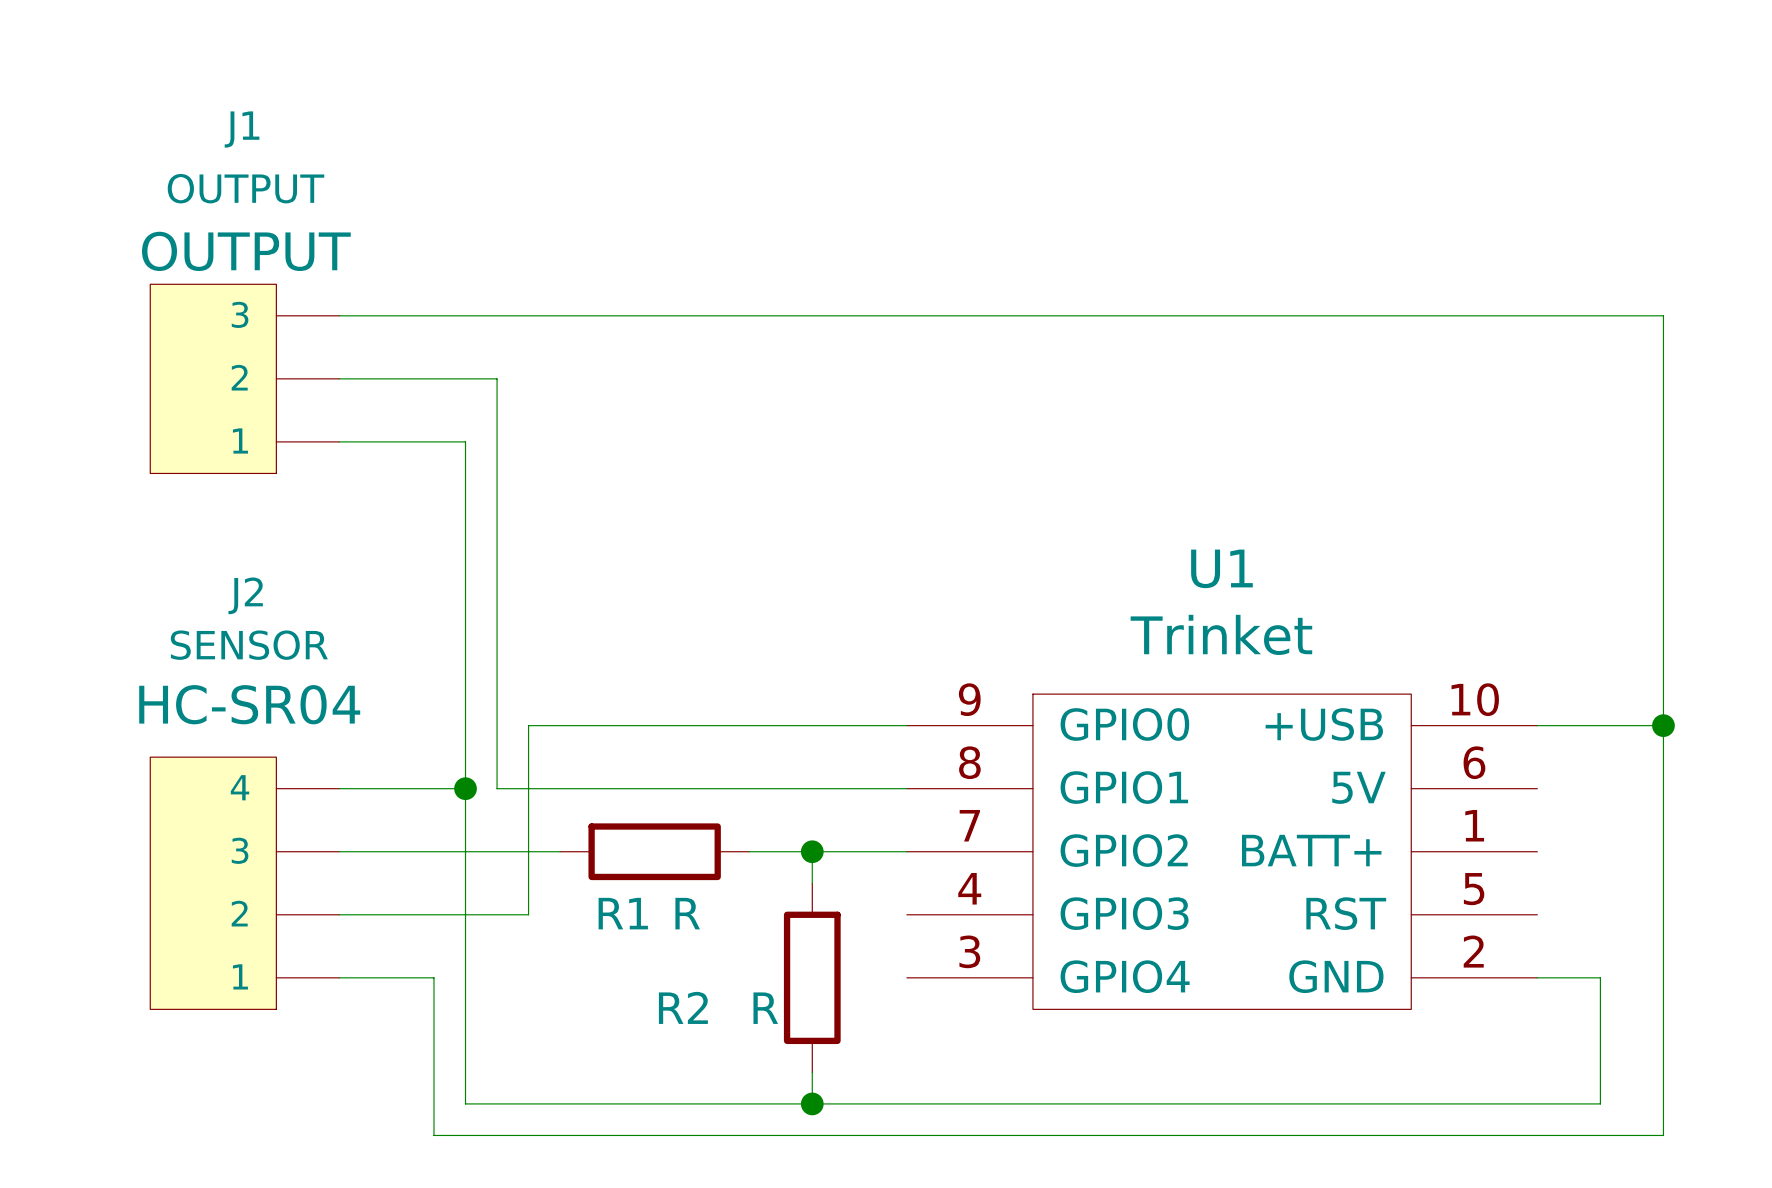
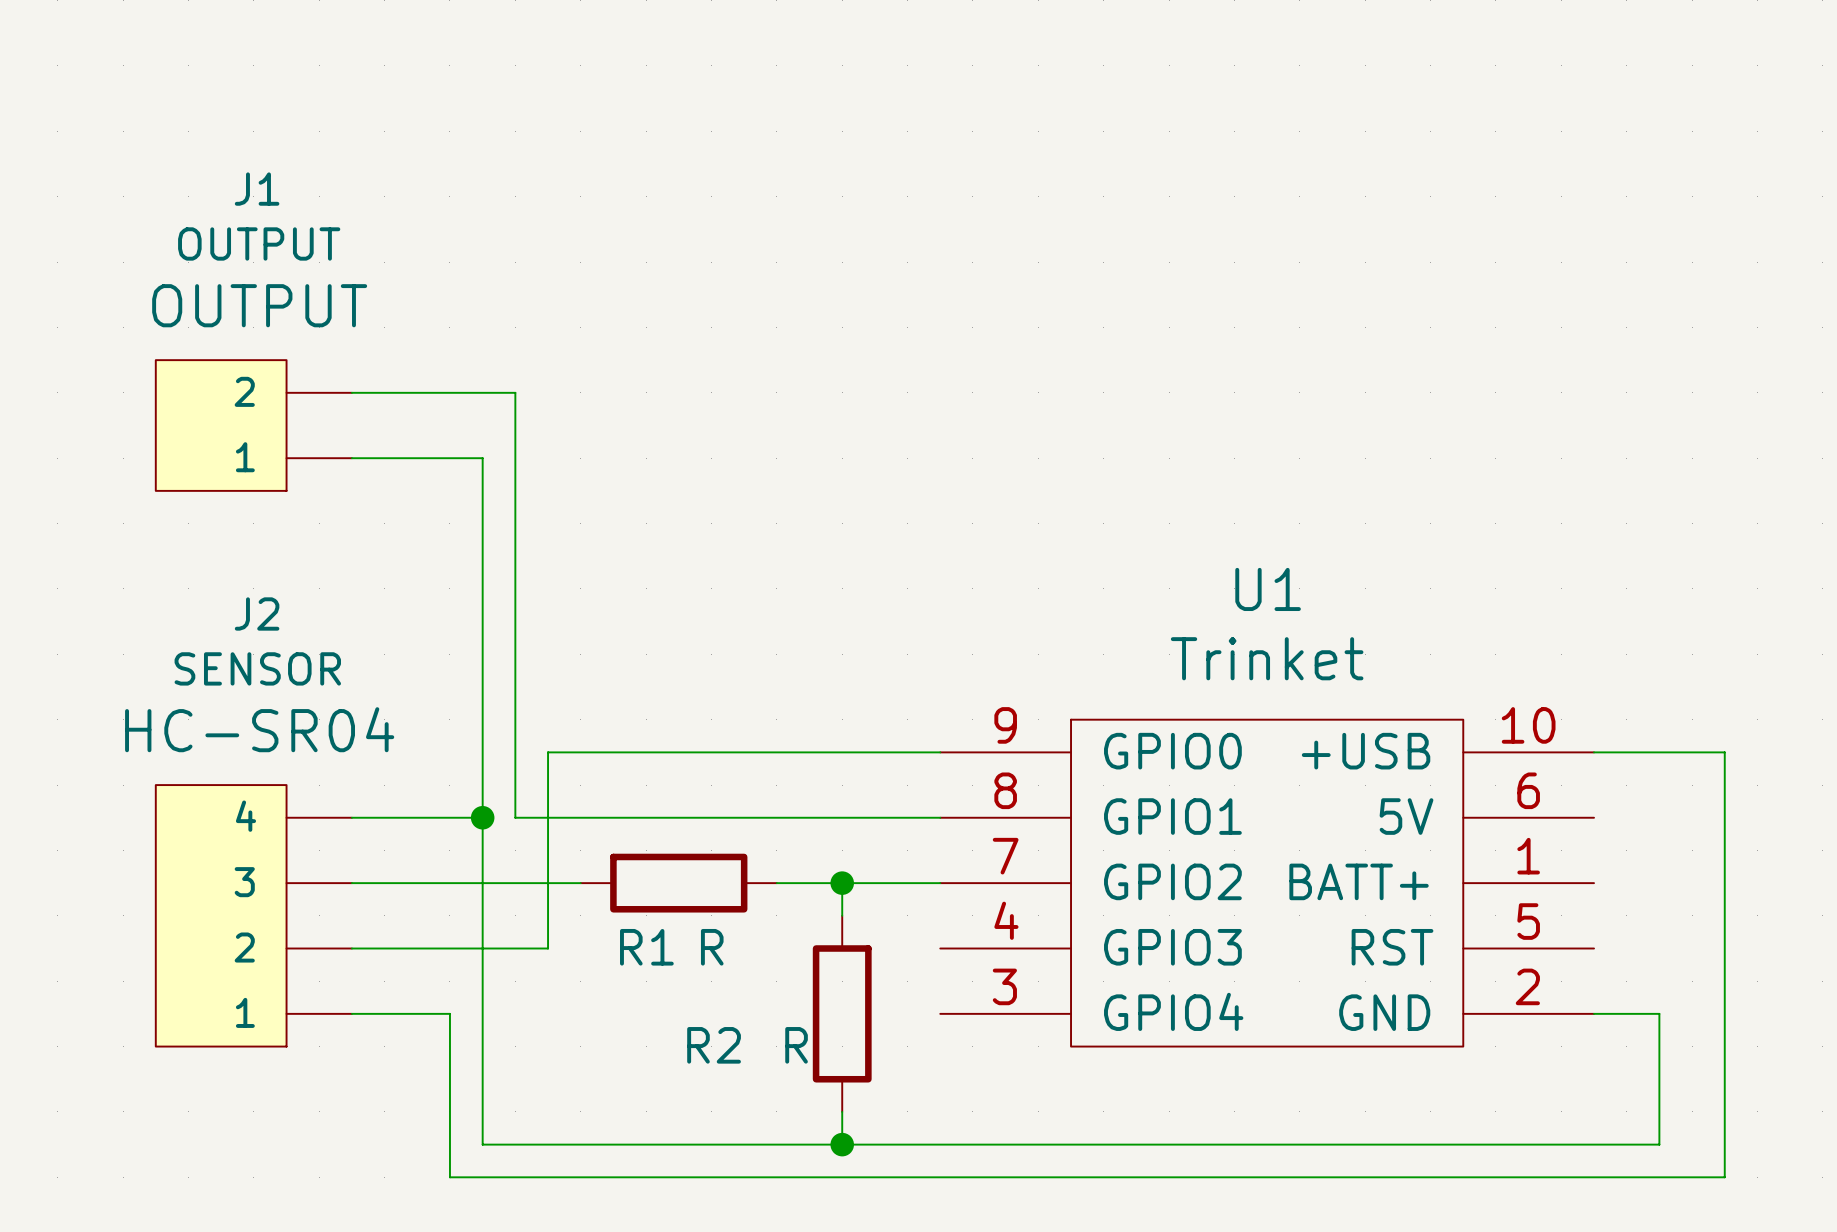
J1 symbol: [150, 284, 340, 474] -> [155, 360, 352, 491]
wire: (339, 315) (1663, 315) (1663, 725) -> none
junction: (1663, 725) -> none

